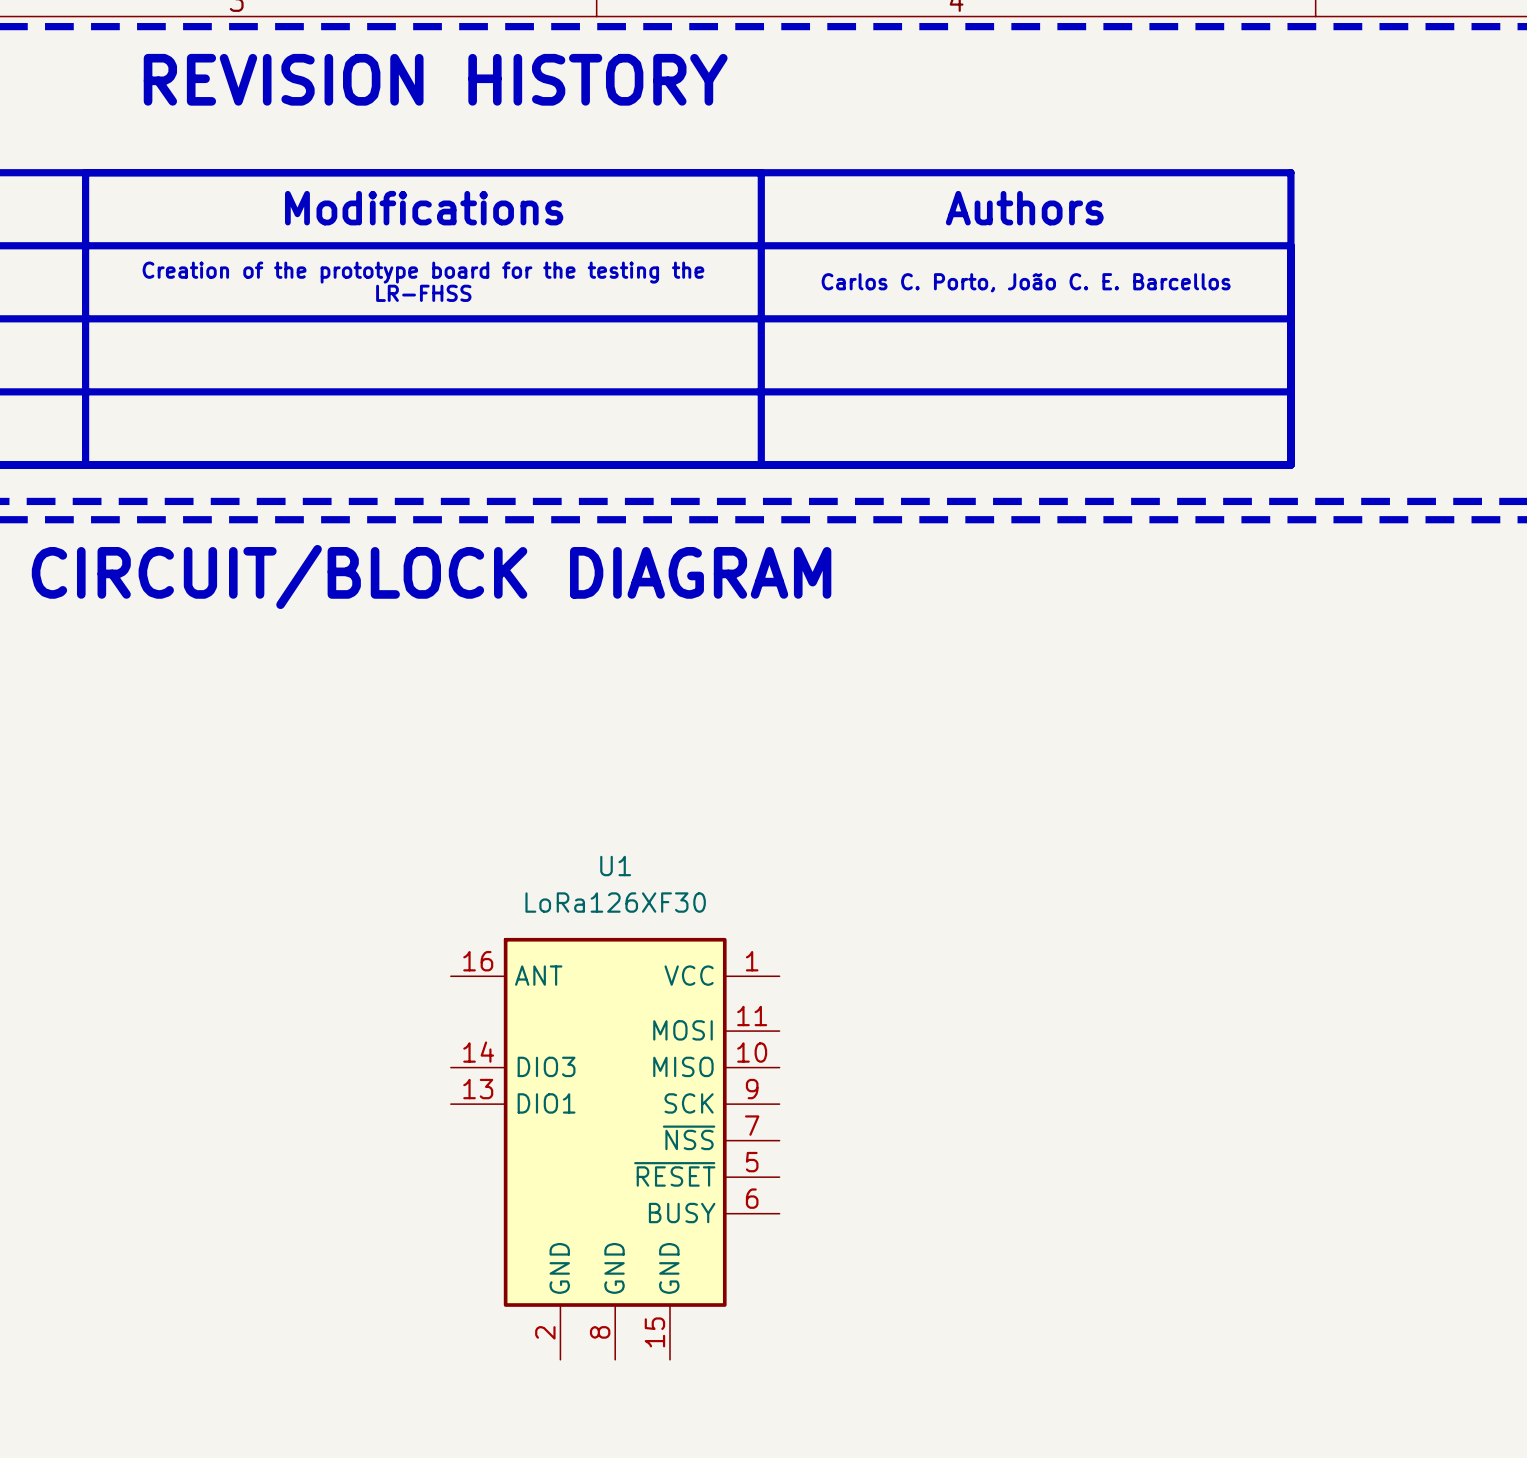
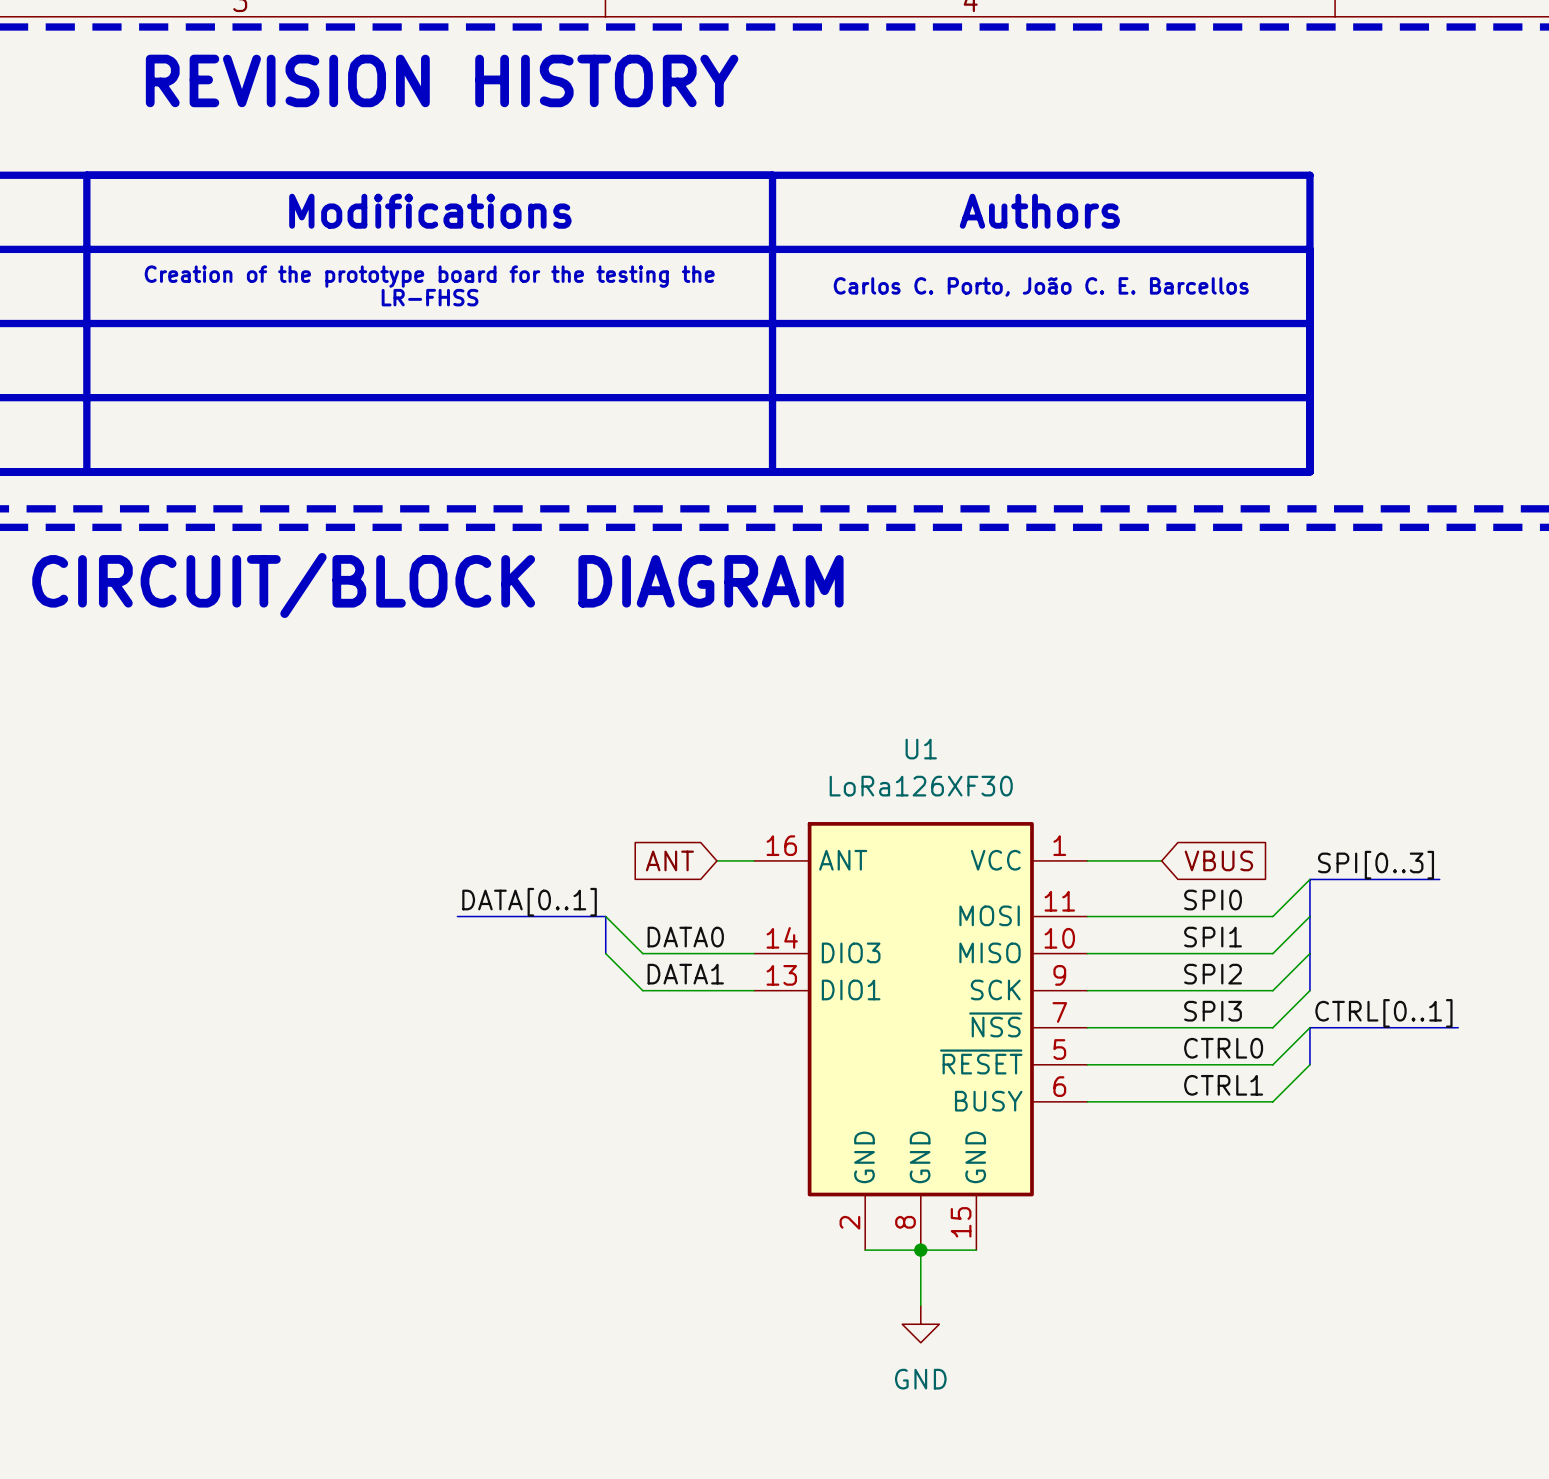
global label: none -> ANT (669, 860)
wire: none -> (716, 860) (754, 860)
wire: none -> (1087, 860) (1161, 860)
global label: none -> VBUS (1218, 860)
label: none -> SPI[0..3] (1376, 865)
wire: none -> (1309, 879) (1272, 916) (1087, 916)
bus: none -> (1439, 879) (1309, 879) (1309, 990)
label: none -> SPI0 (1213, 900)
label: none -> DATA[0..1] (529, 902)
bus: none -> (457, 916) (605, 916) (605, 953)
wire: none -> (605, 916) (642, 953) (754, 953)
wire: none -> (1309, 916) (1272, 953) (1087, 953)
label: none -> DATA0 (685, 937)
label: none -> SPI1 (1213, 937)
wire: none -> (1309, 953) (1272, 990) (1087, 990)
label: none -> DATA1 (685, 974)
label: none -> SPI2 (1213, 974)
wire: none -> (1309, 990) (1272, 1027) (1087, 1027)
label: none -> SPI3 (1213, 1011)
label: none -> CTRL[0..1] (1383, 1013)
wire: none -> (1309, 1027) (1272, 1064) (1087, 1064)
bus: none -> (1458, 1027) (1309, 1027) (1309, 1064)
label: none -> CTRL0 (1223, 1048)
wire: none -> (1309, 1064) (1272, 1101) (1087, 1101)
label: none -> CTRL1 (1223, 1085)
U1 position: (615, 1148) -> (920, 1036)
wire: none -> (865, 1250) (976, 1250)
wire: none -> (920, 1250) (920, 1305)
junction: none -> (920, 1250)
power symbol: none -> GND (920, 1324)

